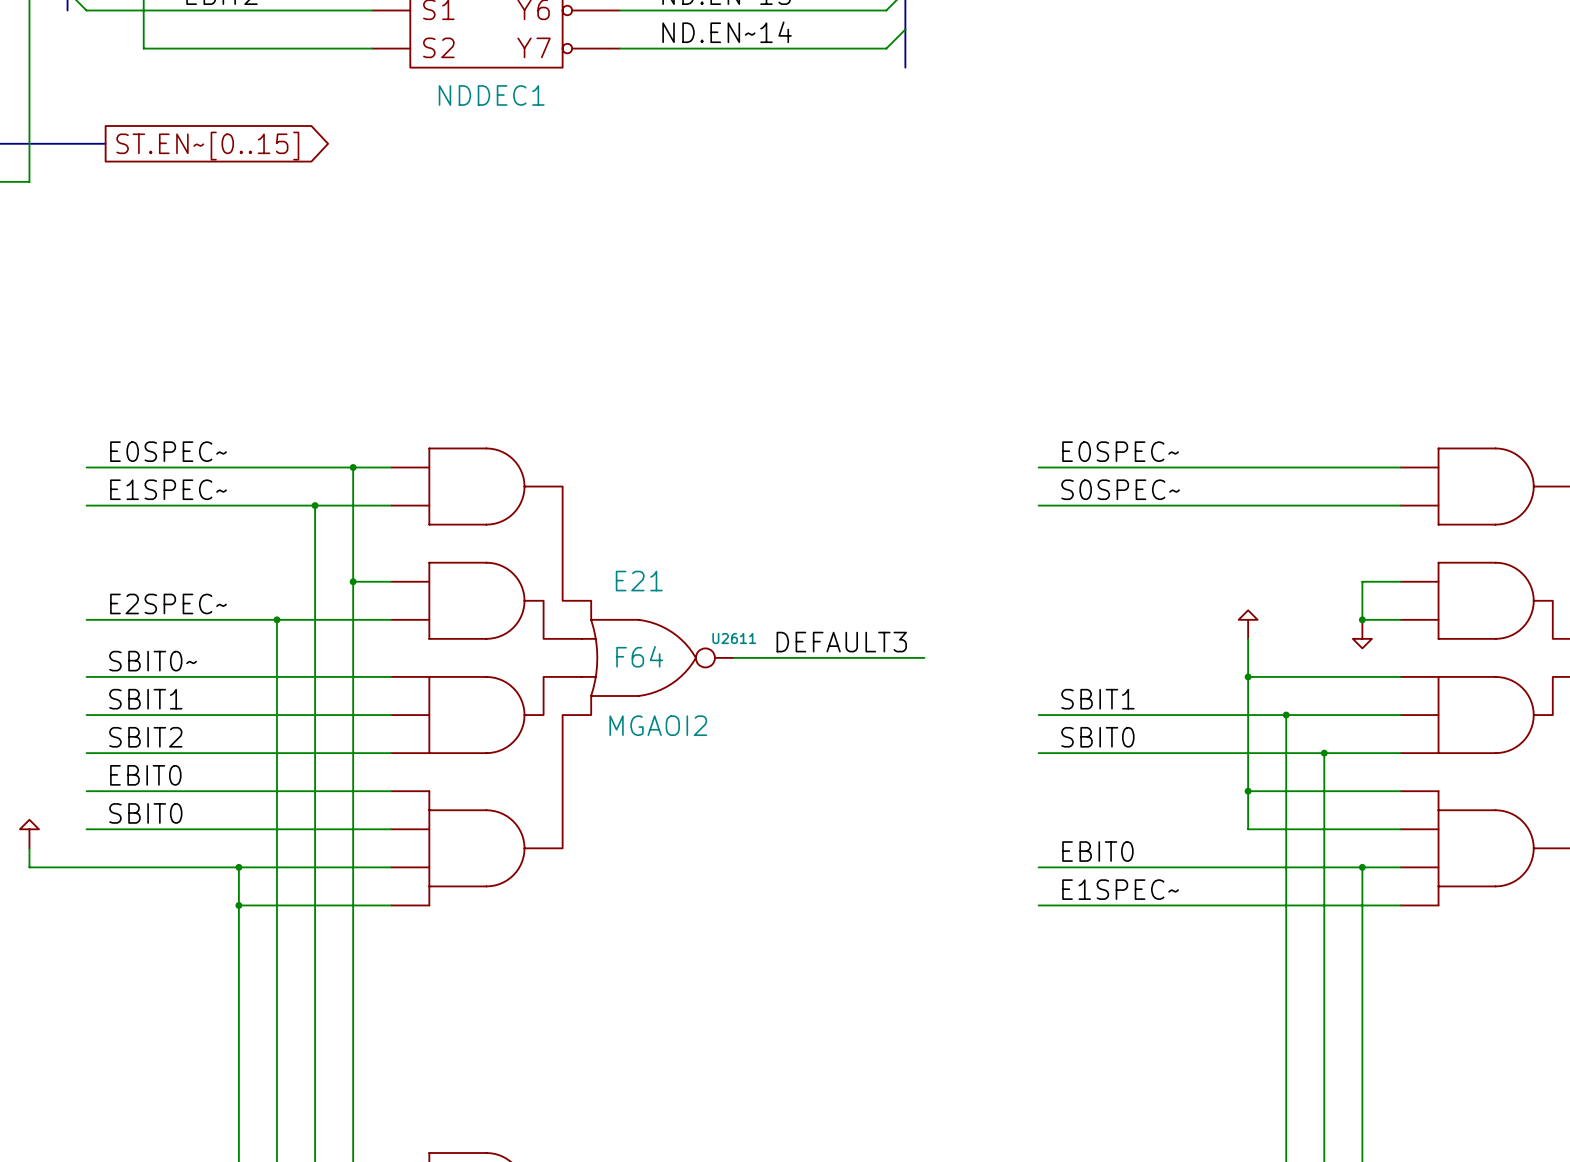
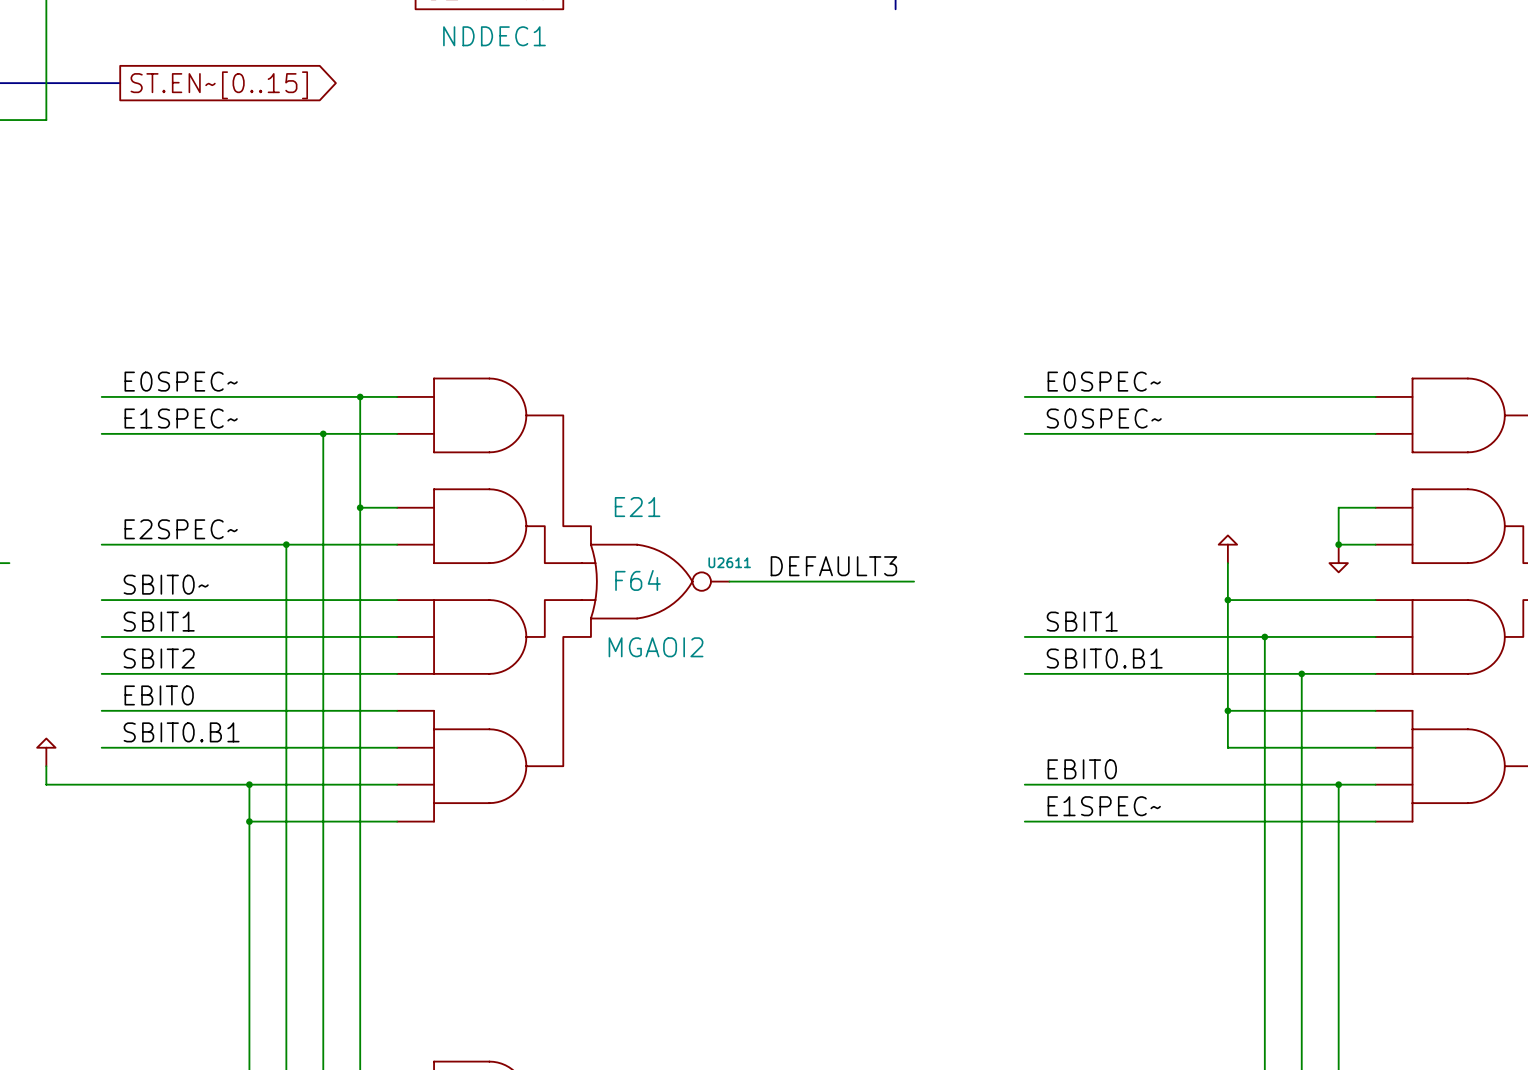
label: SBIT0 (1097, 737) -> SBIT0.B1 (1104, 658)
label: SBIT0 (145, 813) -> SBIT0.B1 (181, 732)

